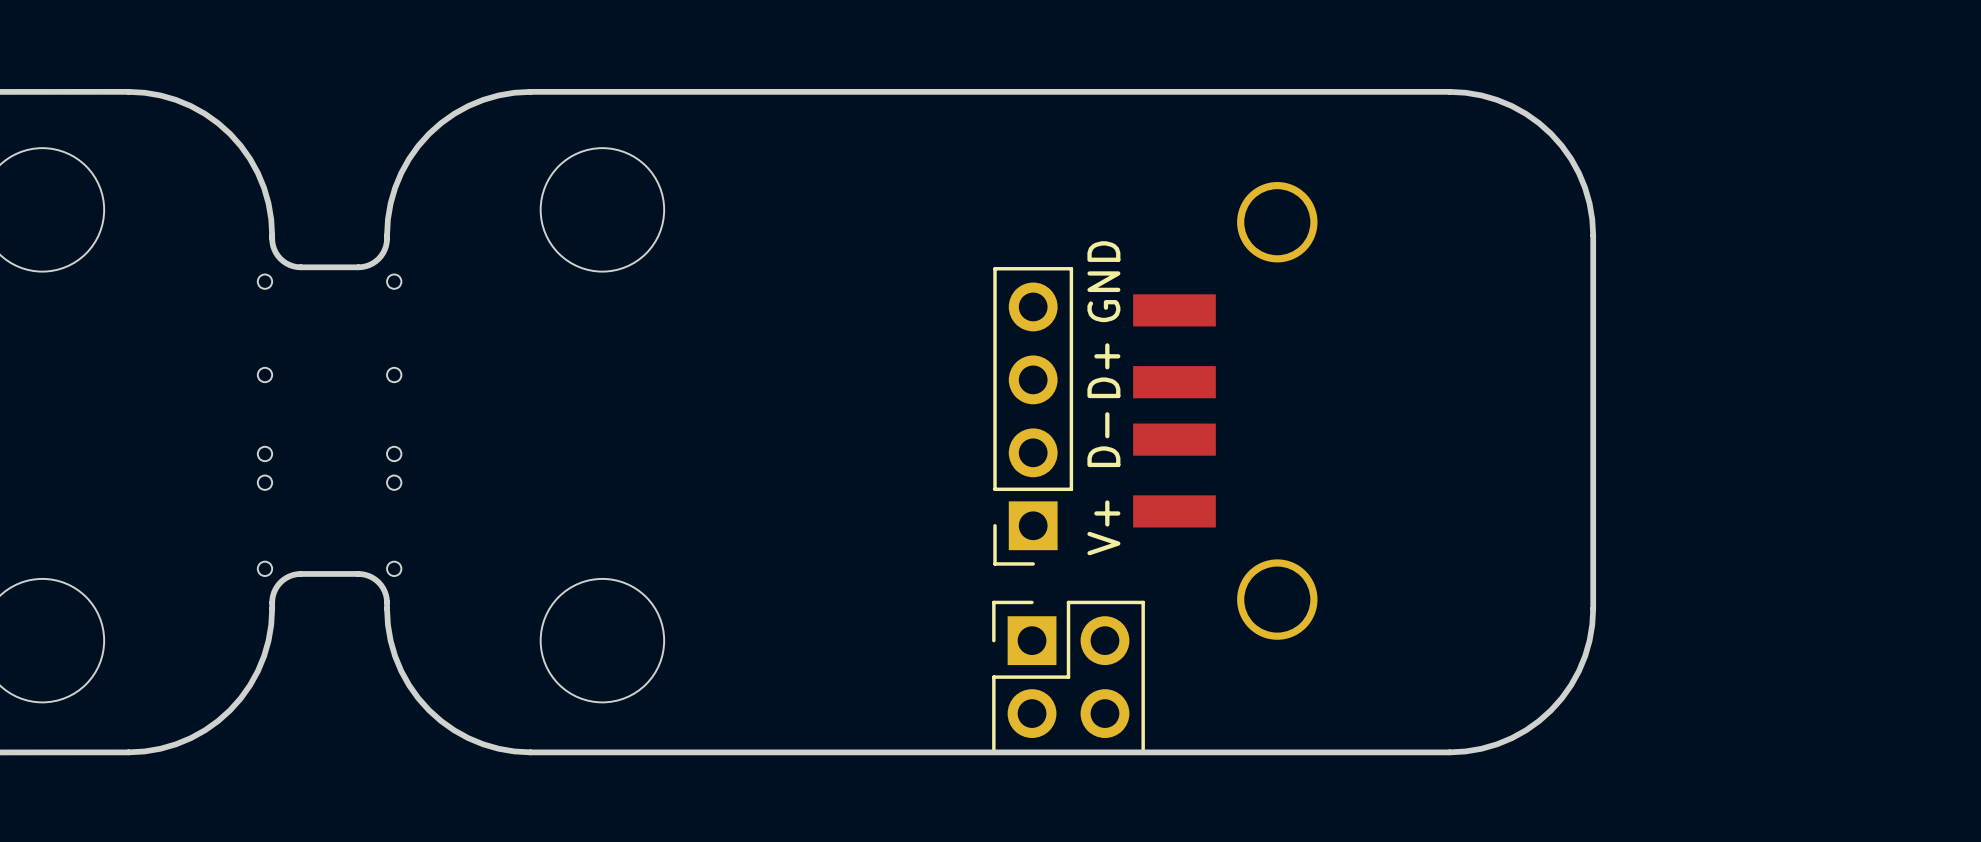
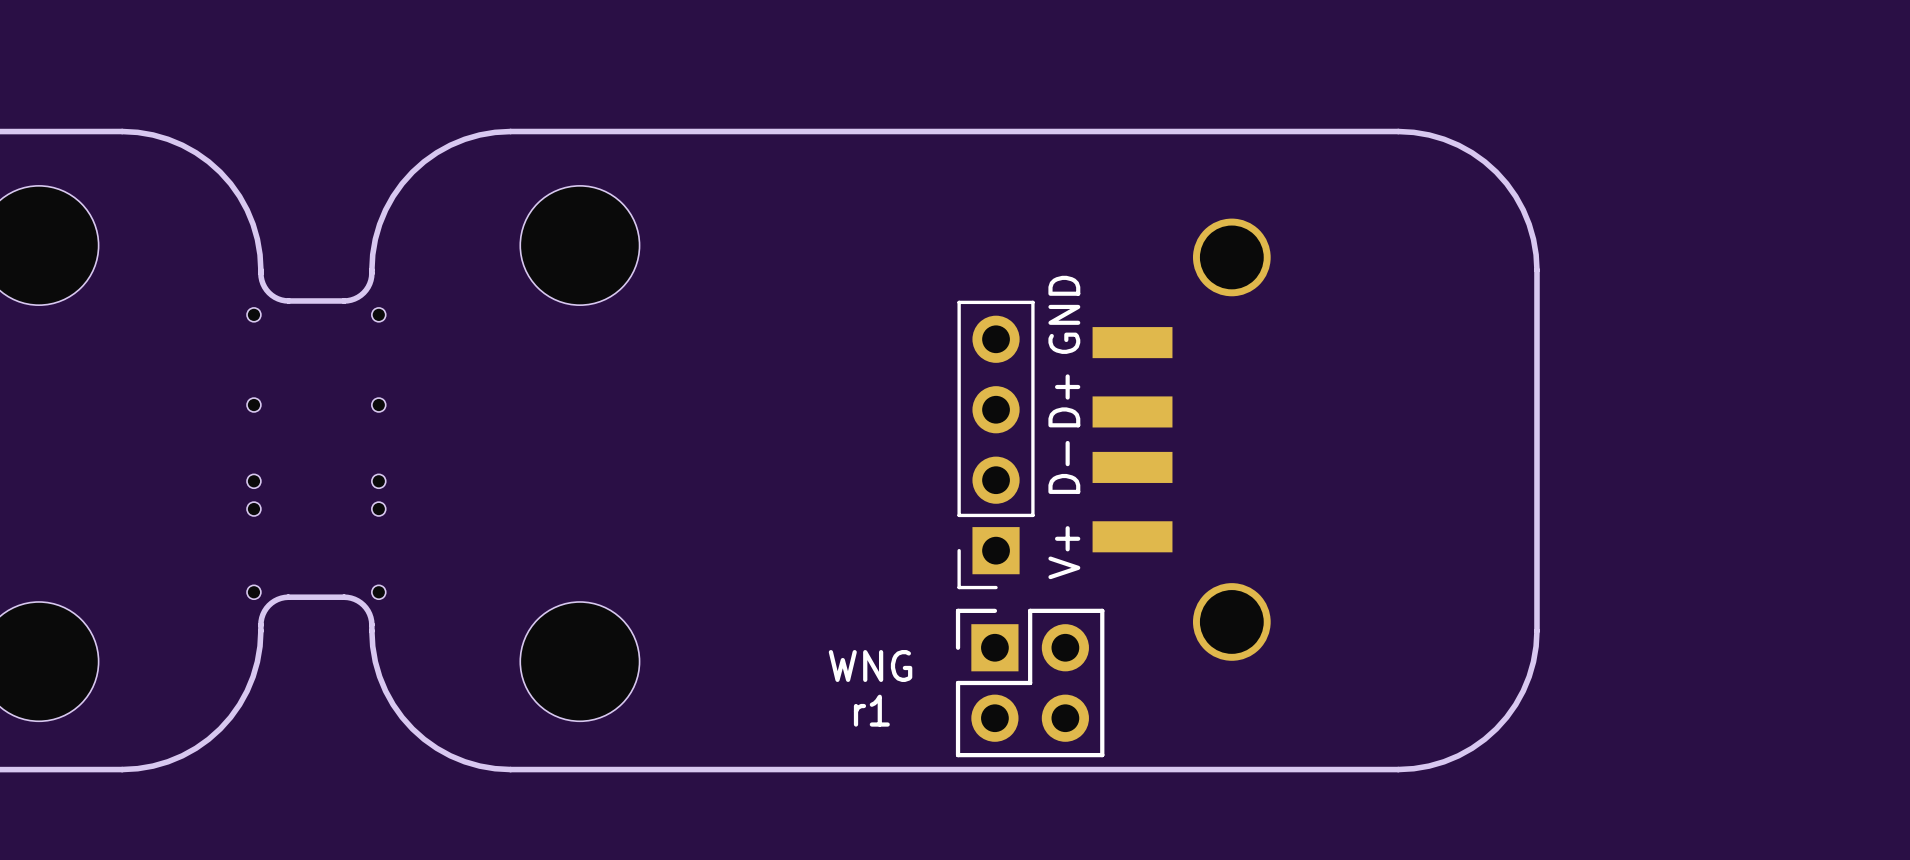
part footprint: [992, 600, 1145, 754] -> [955, 608, 1105, 758]
text: none -> WNG (870, 666)
text: none -> r1 (871, 710)

